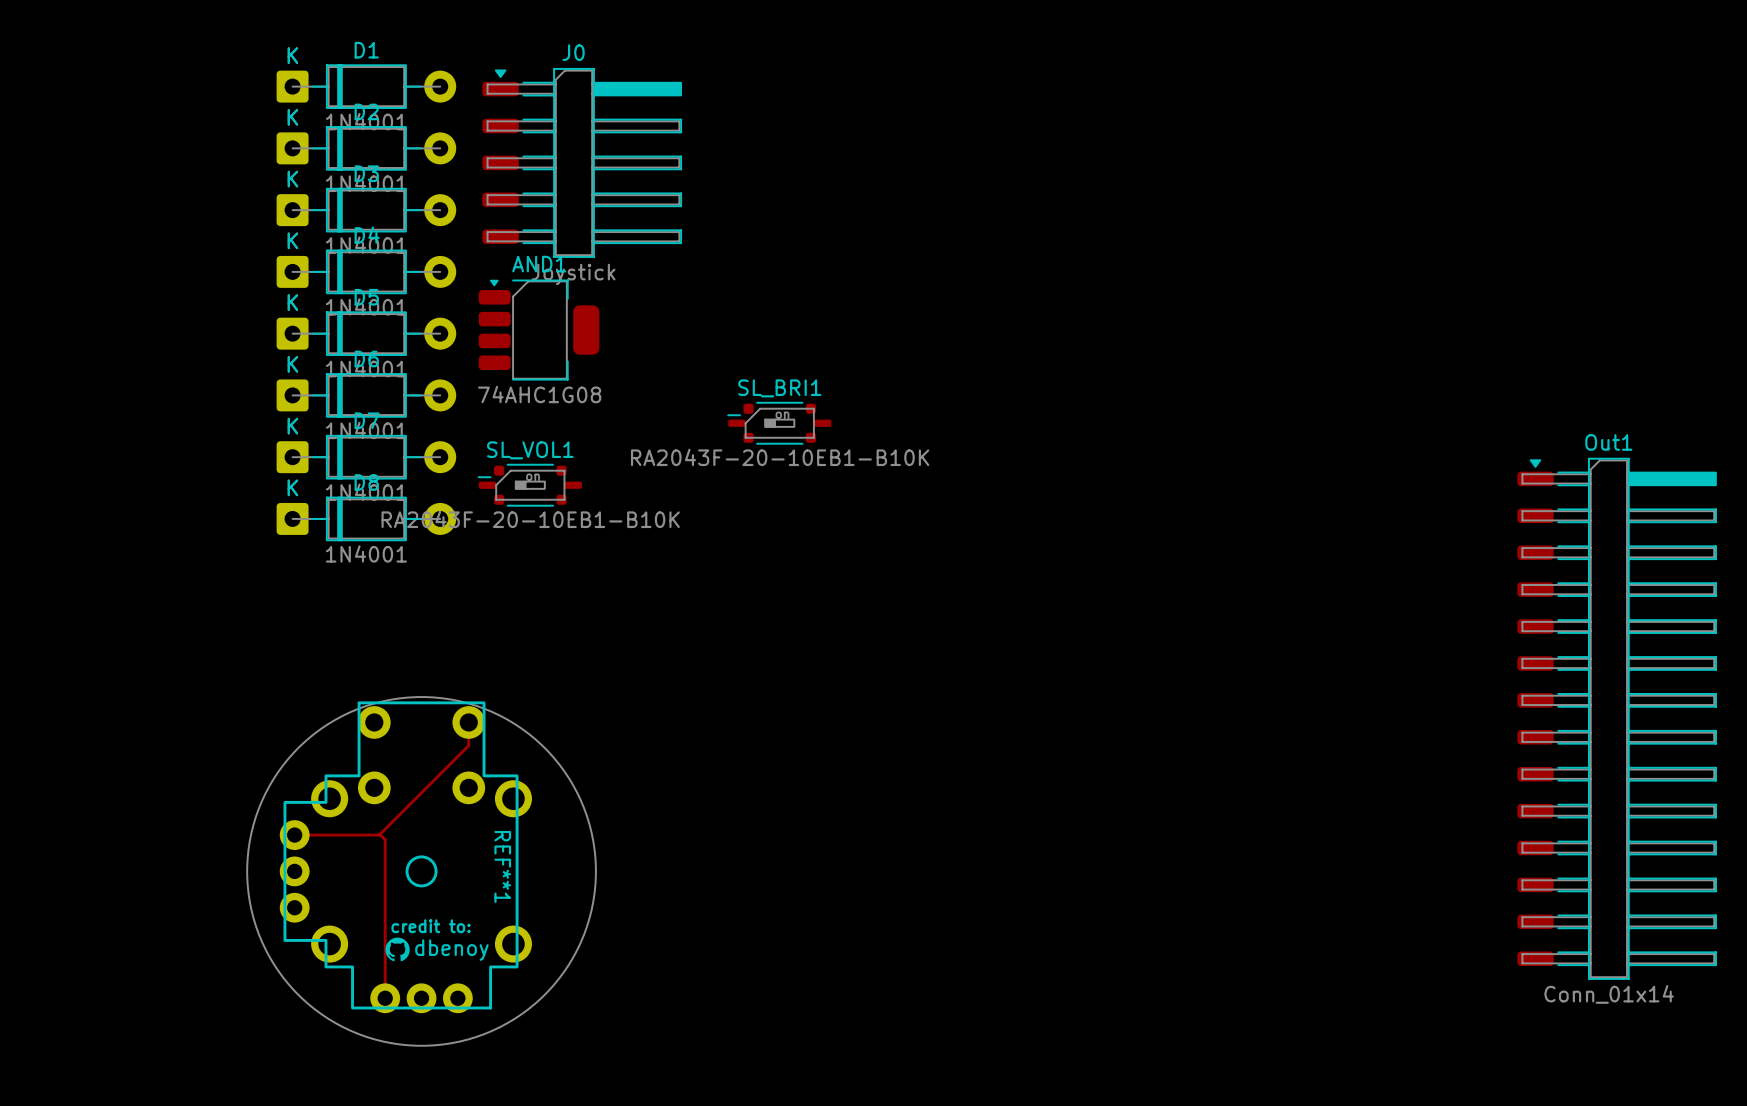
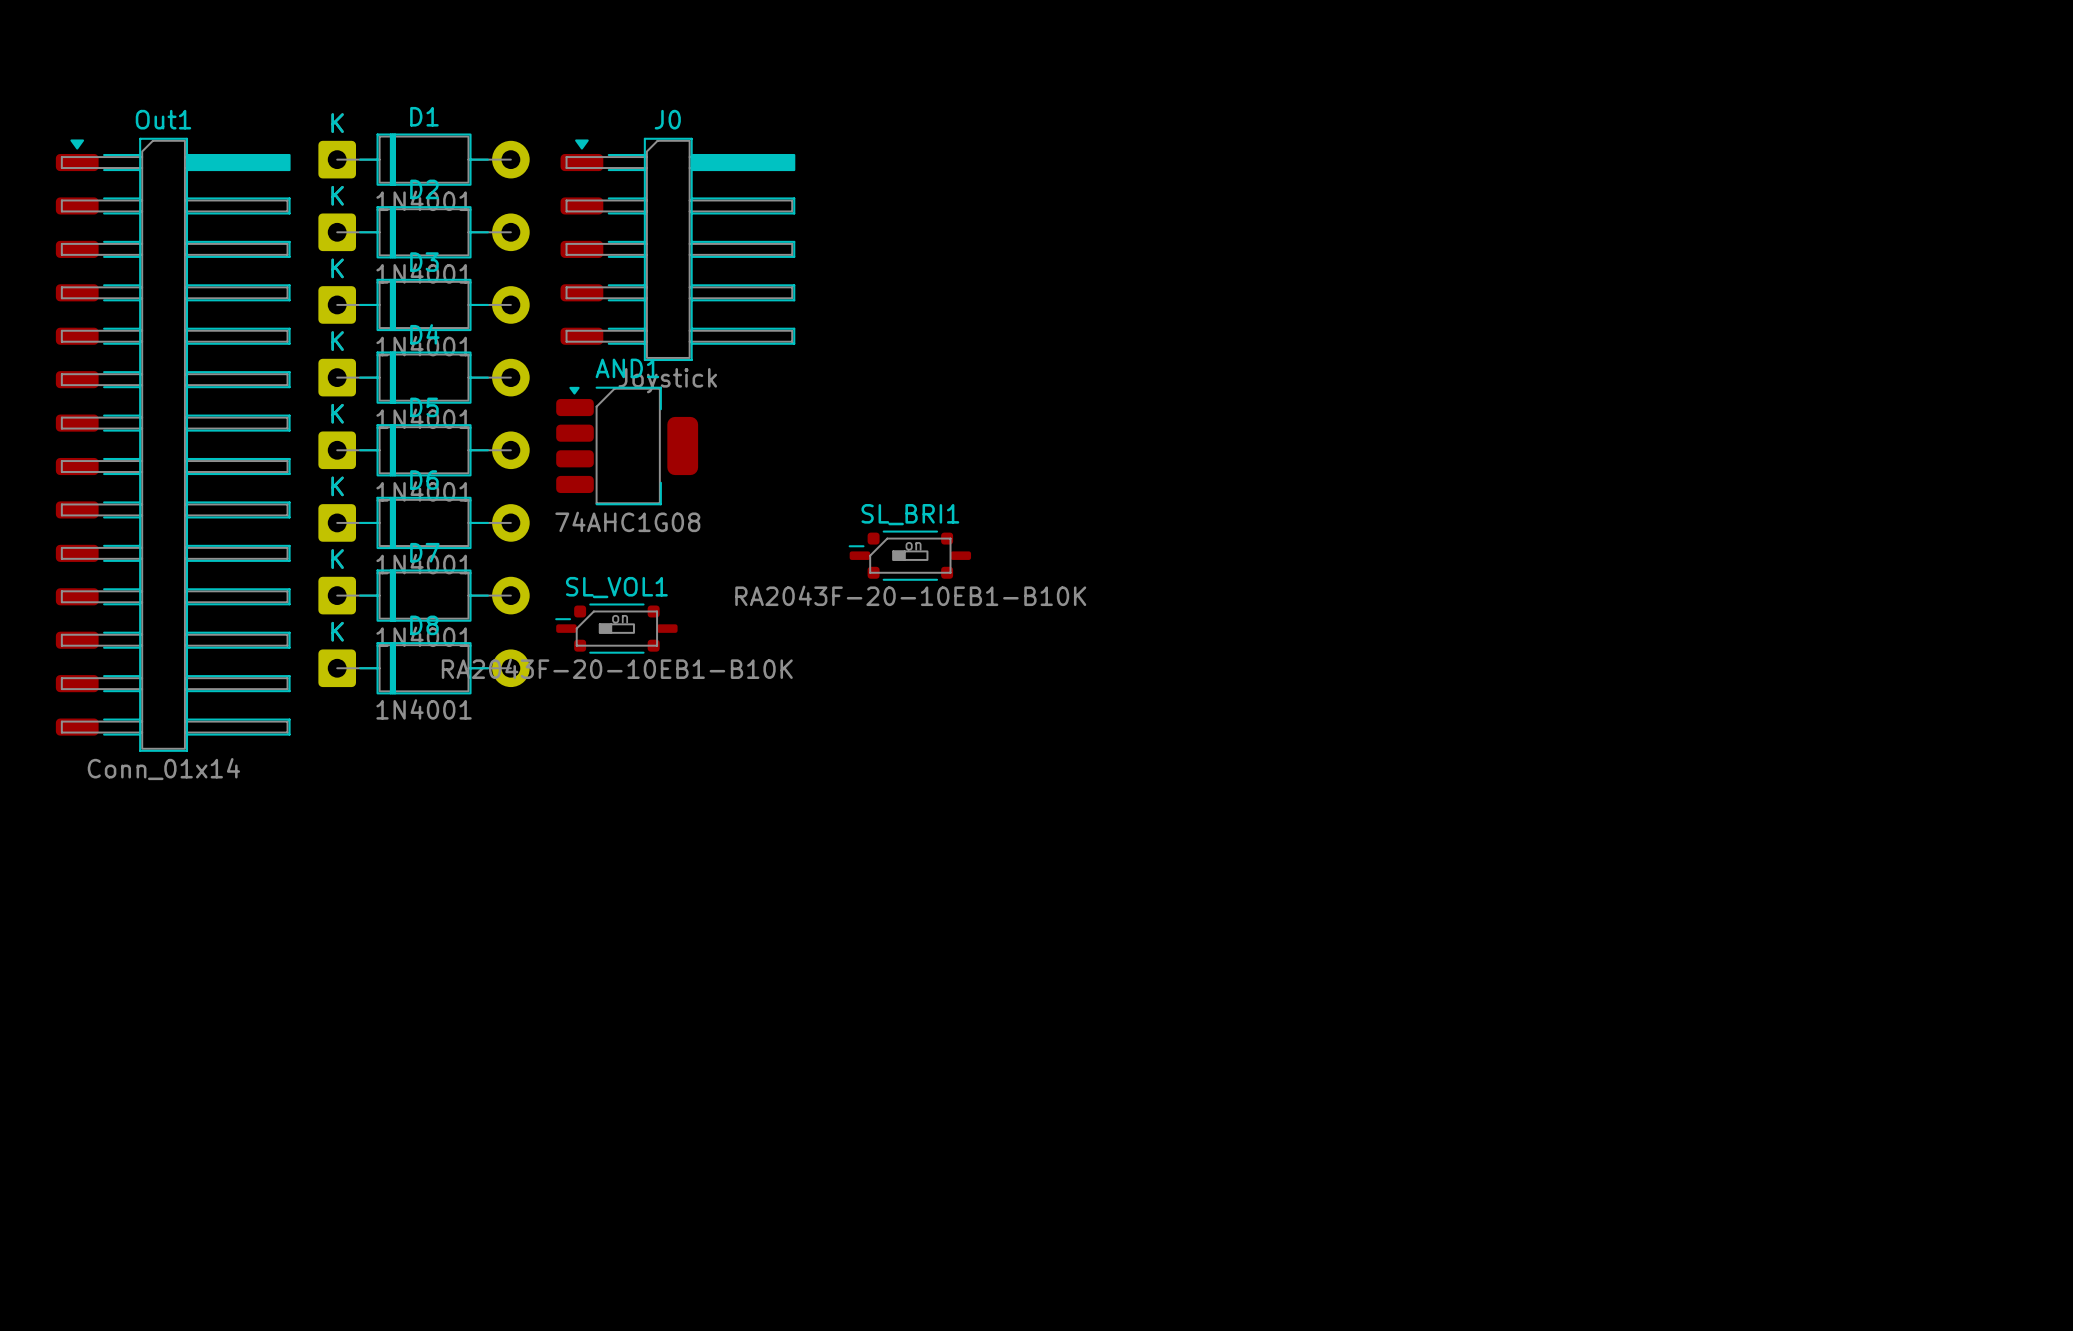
Out1 position: (1617, 718) -> (173, 444)
track: (468, 722) (468, 745) (379, 835) (294, 835) -> none
track: (379, 834) (385, 839) (385, 998) -> none
REF**1: (421, 871) -> none
text: credit to: (431, 926) -> none
drawing: [385, 937, 410, 962] -> none
text: dbenoy (451, 950) -> none

